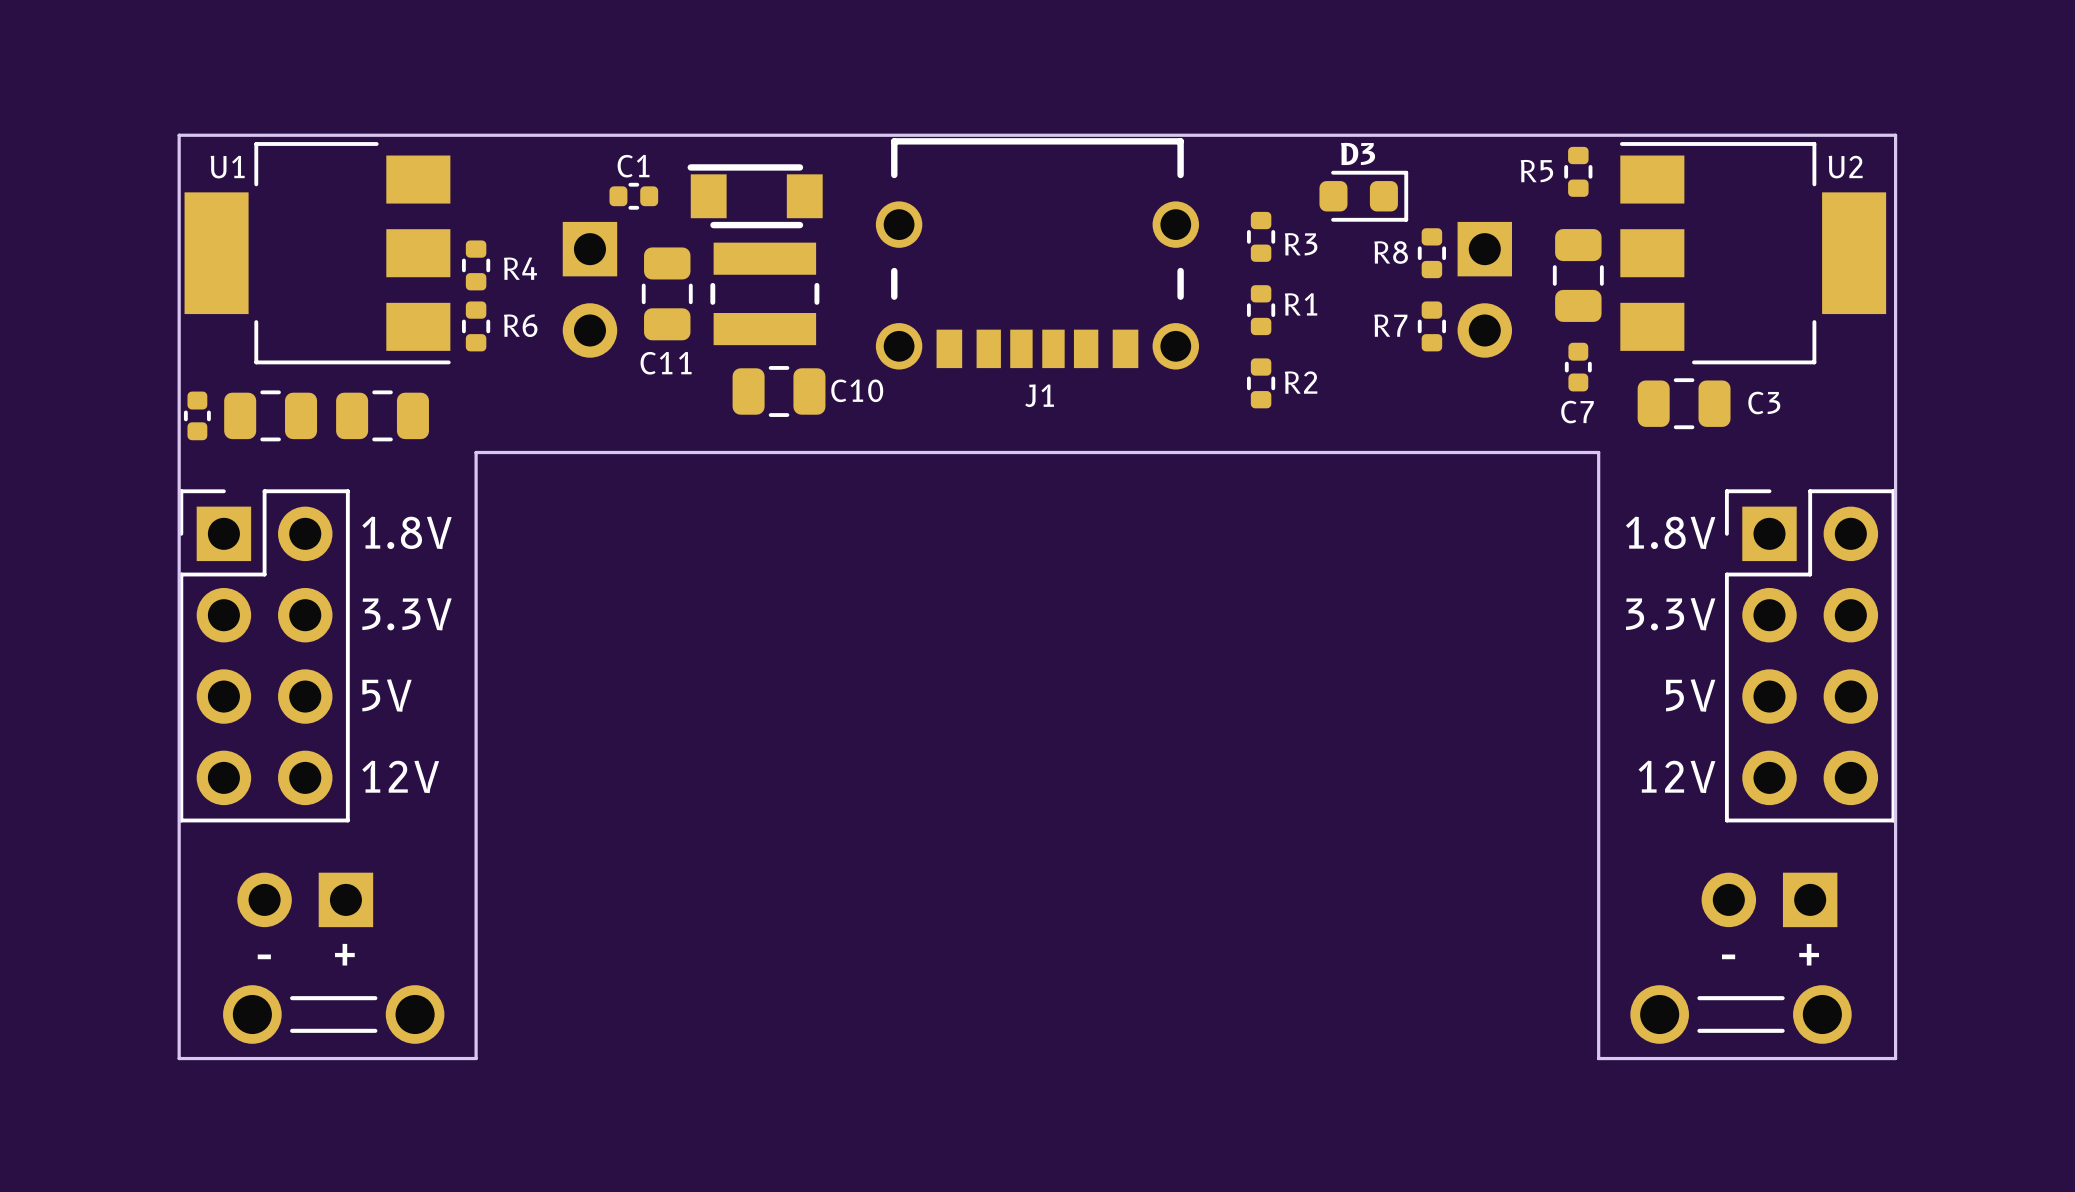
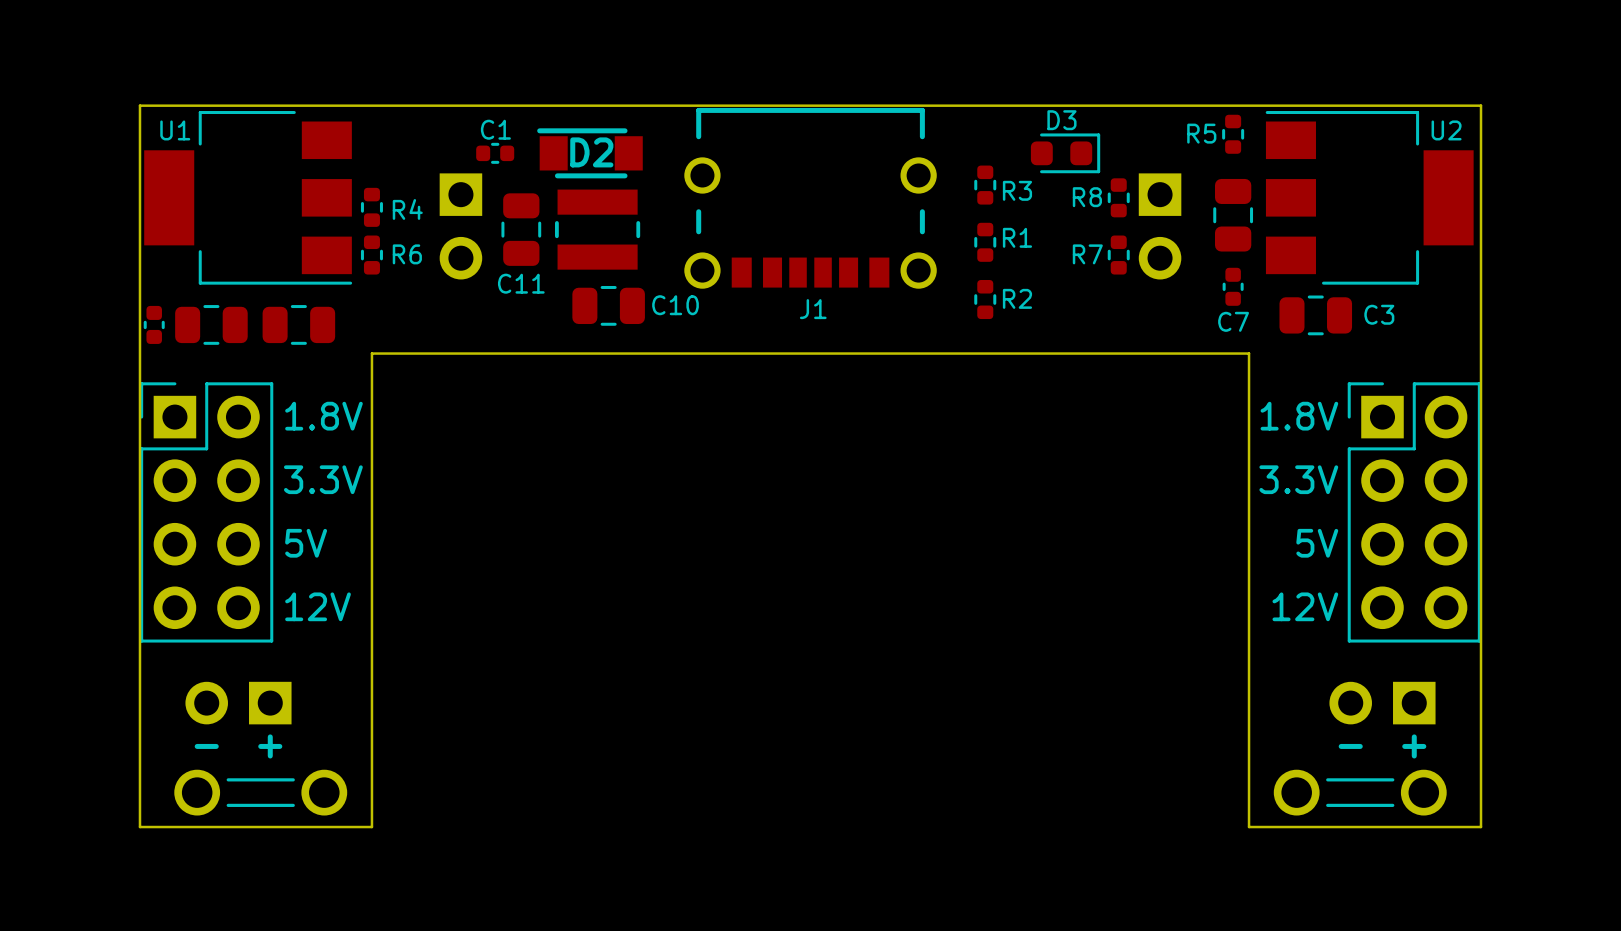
D2 name: none -> D2 (591, 152)

